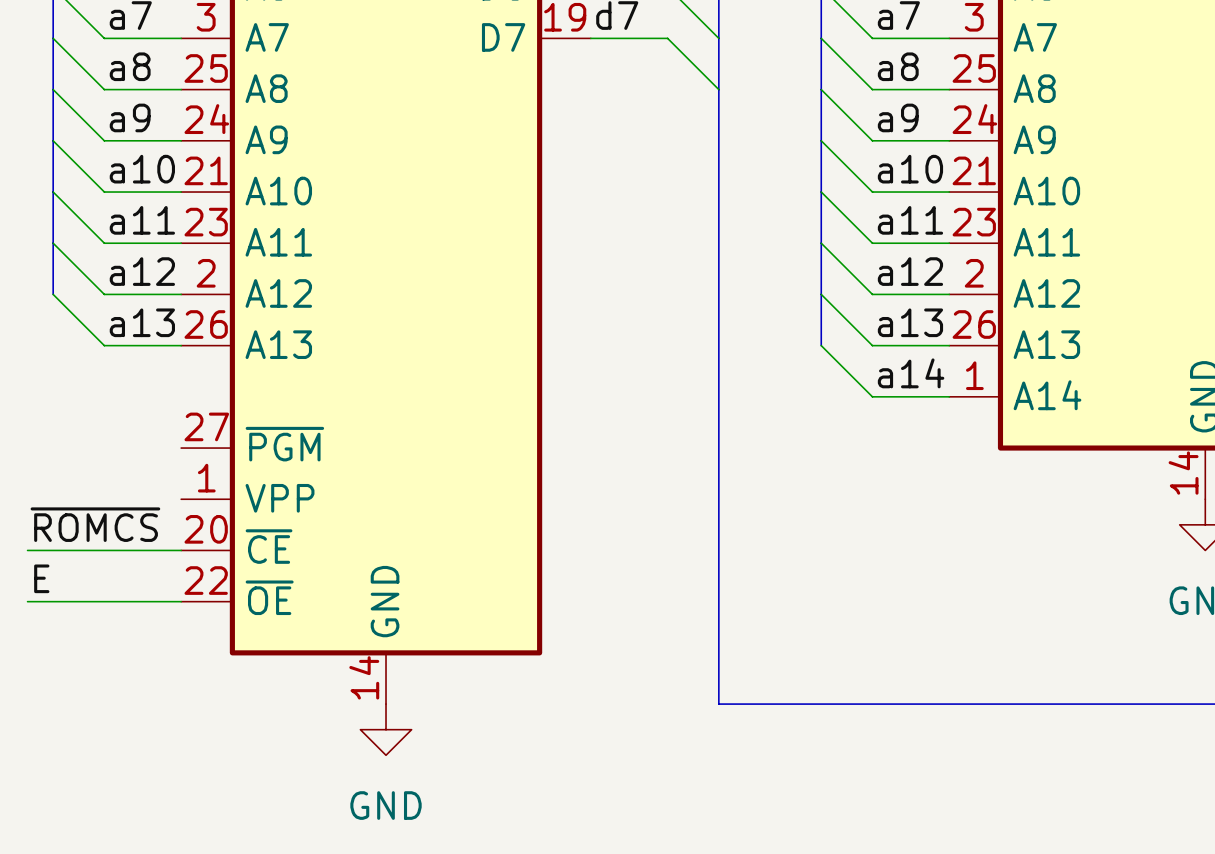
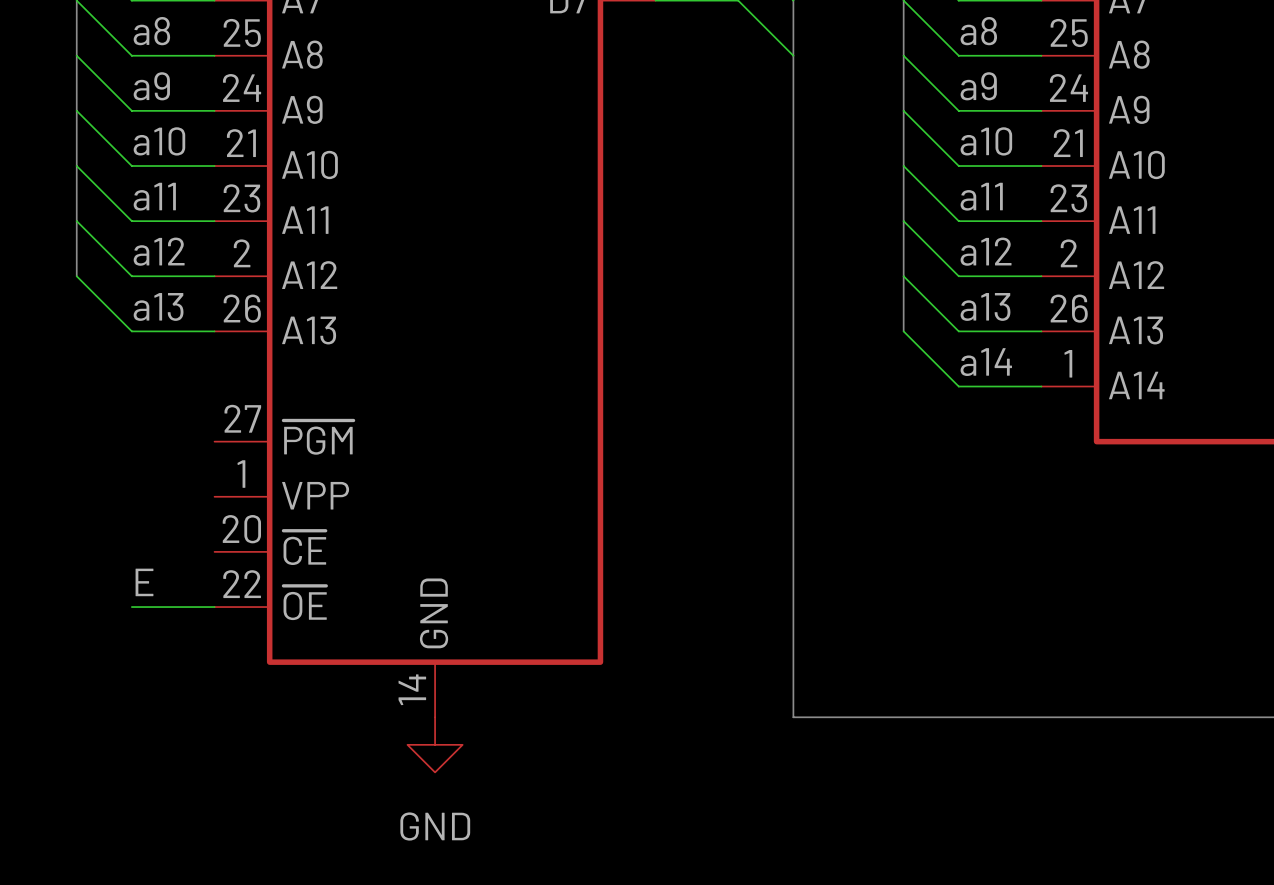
label: ~{ROMCS} (95, 524) -> none
wire: (27, 550) (181, 550) -> none
label position: E (41, 578) -> E (144, 582)
wire: (27, 601) (104, 601) -> none

